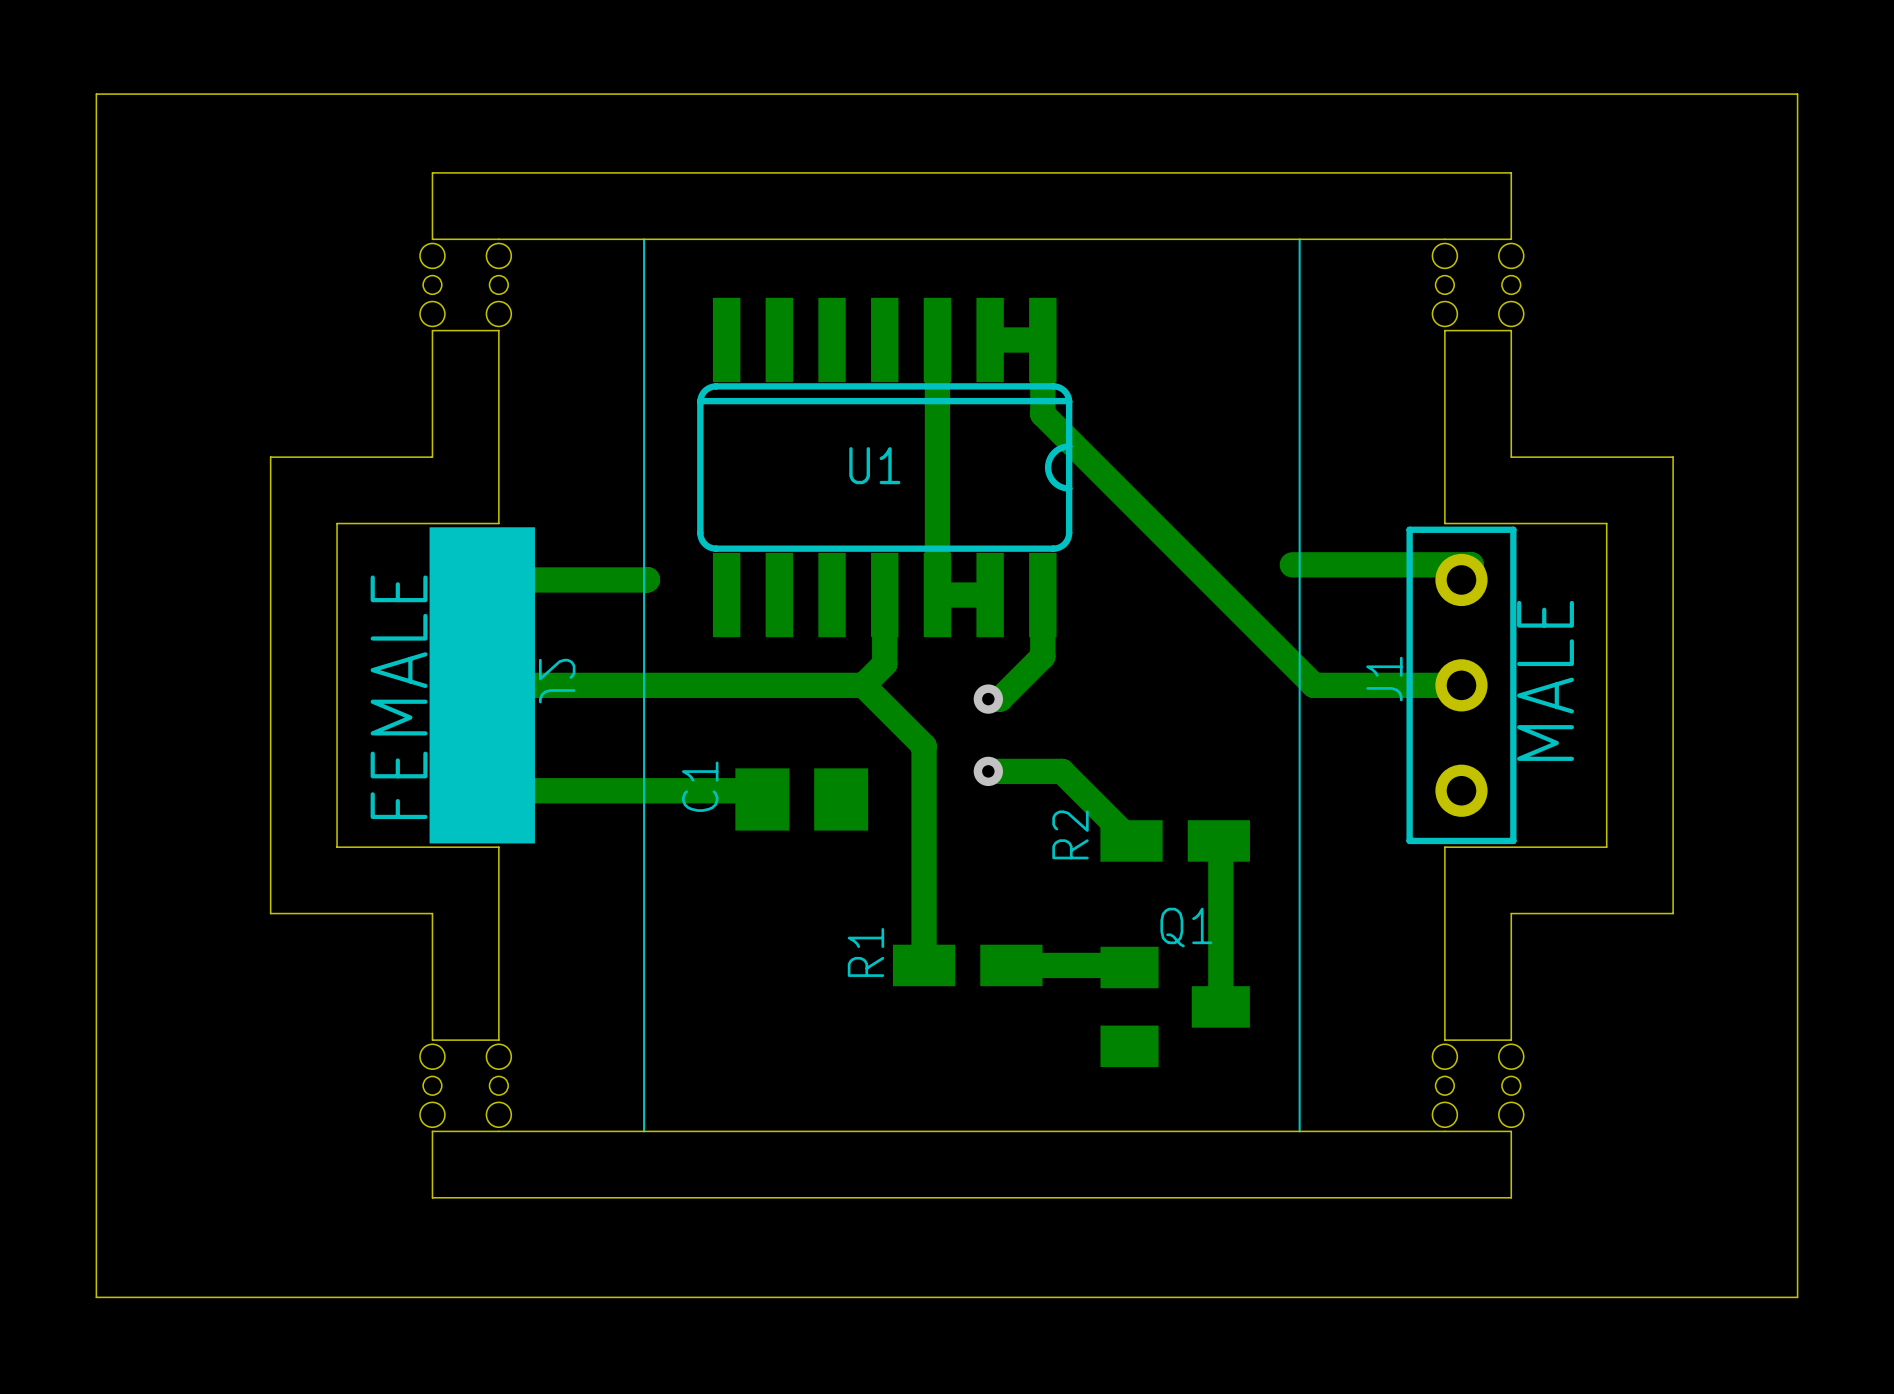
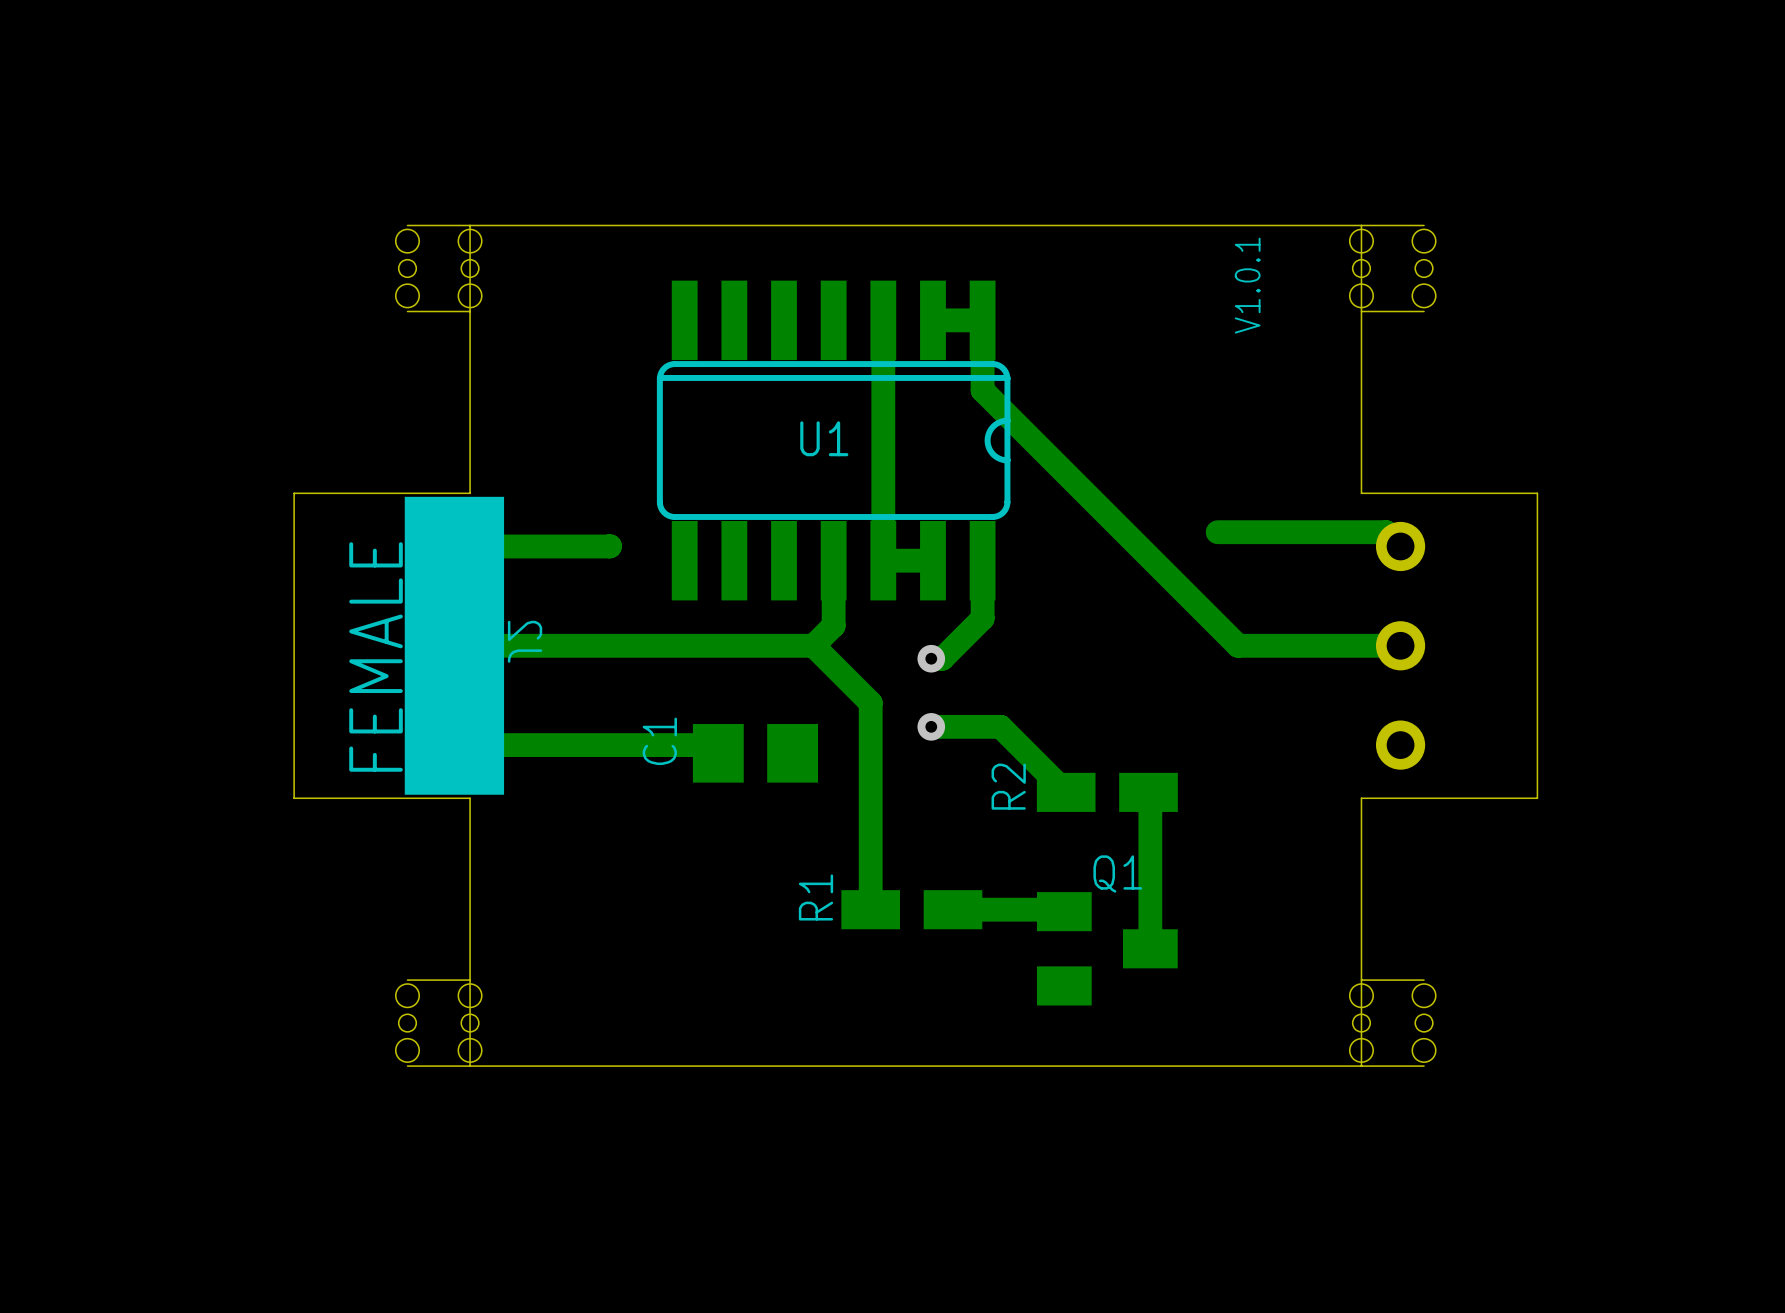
board edge: (1797, 94) (96, 94) (96, 1297) (1797, 1297) (1797, 94) -> none
board edge: none -> (470, 225) (470, 311)
line: (644, 239) (644, 1131) -> none
line: (1299, 239) (1299, 1131) -> none
board edge: none -> (1361, 225) (1361, 311)
board edge: (1511, 239) (1511, 172) (432, 172) (432, 239) -> none
text: none -> V1.0.1 (1247, 285)
board edge: (432, 330) (432, 457) (270, 457) (270, 913) (432, 913) (432, 1040) -> none
board edge: (1511, 330) (1511, 457) (1673, 457) (1673, 913) (1511, 913) (1511, 1040) -> none
board edge: (337, 523) (337, 847) -> (317, 493) (294, 493) (294, 798) (317, 798)
board edge: (1606, 523) (1606, 847) -> (1513, 493) (1537, 493) (1537, 798) (1513, 798)
J1: (1461, 685) -> none
part: none -> (1400, 645)
board edge: none -> (470, 980) (470, 1066)
board edge: none -> (1361, 980) (1361, 1066)
board edge: (1511, 1131) (1511, 1197) (432, 1197) (432, 1131) -> none

